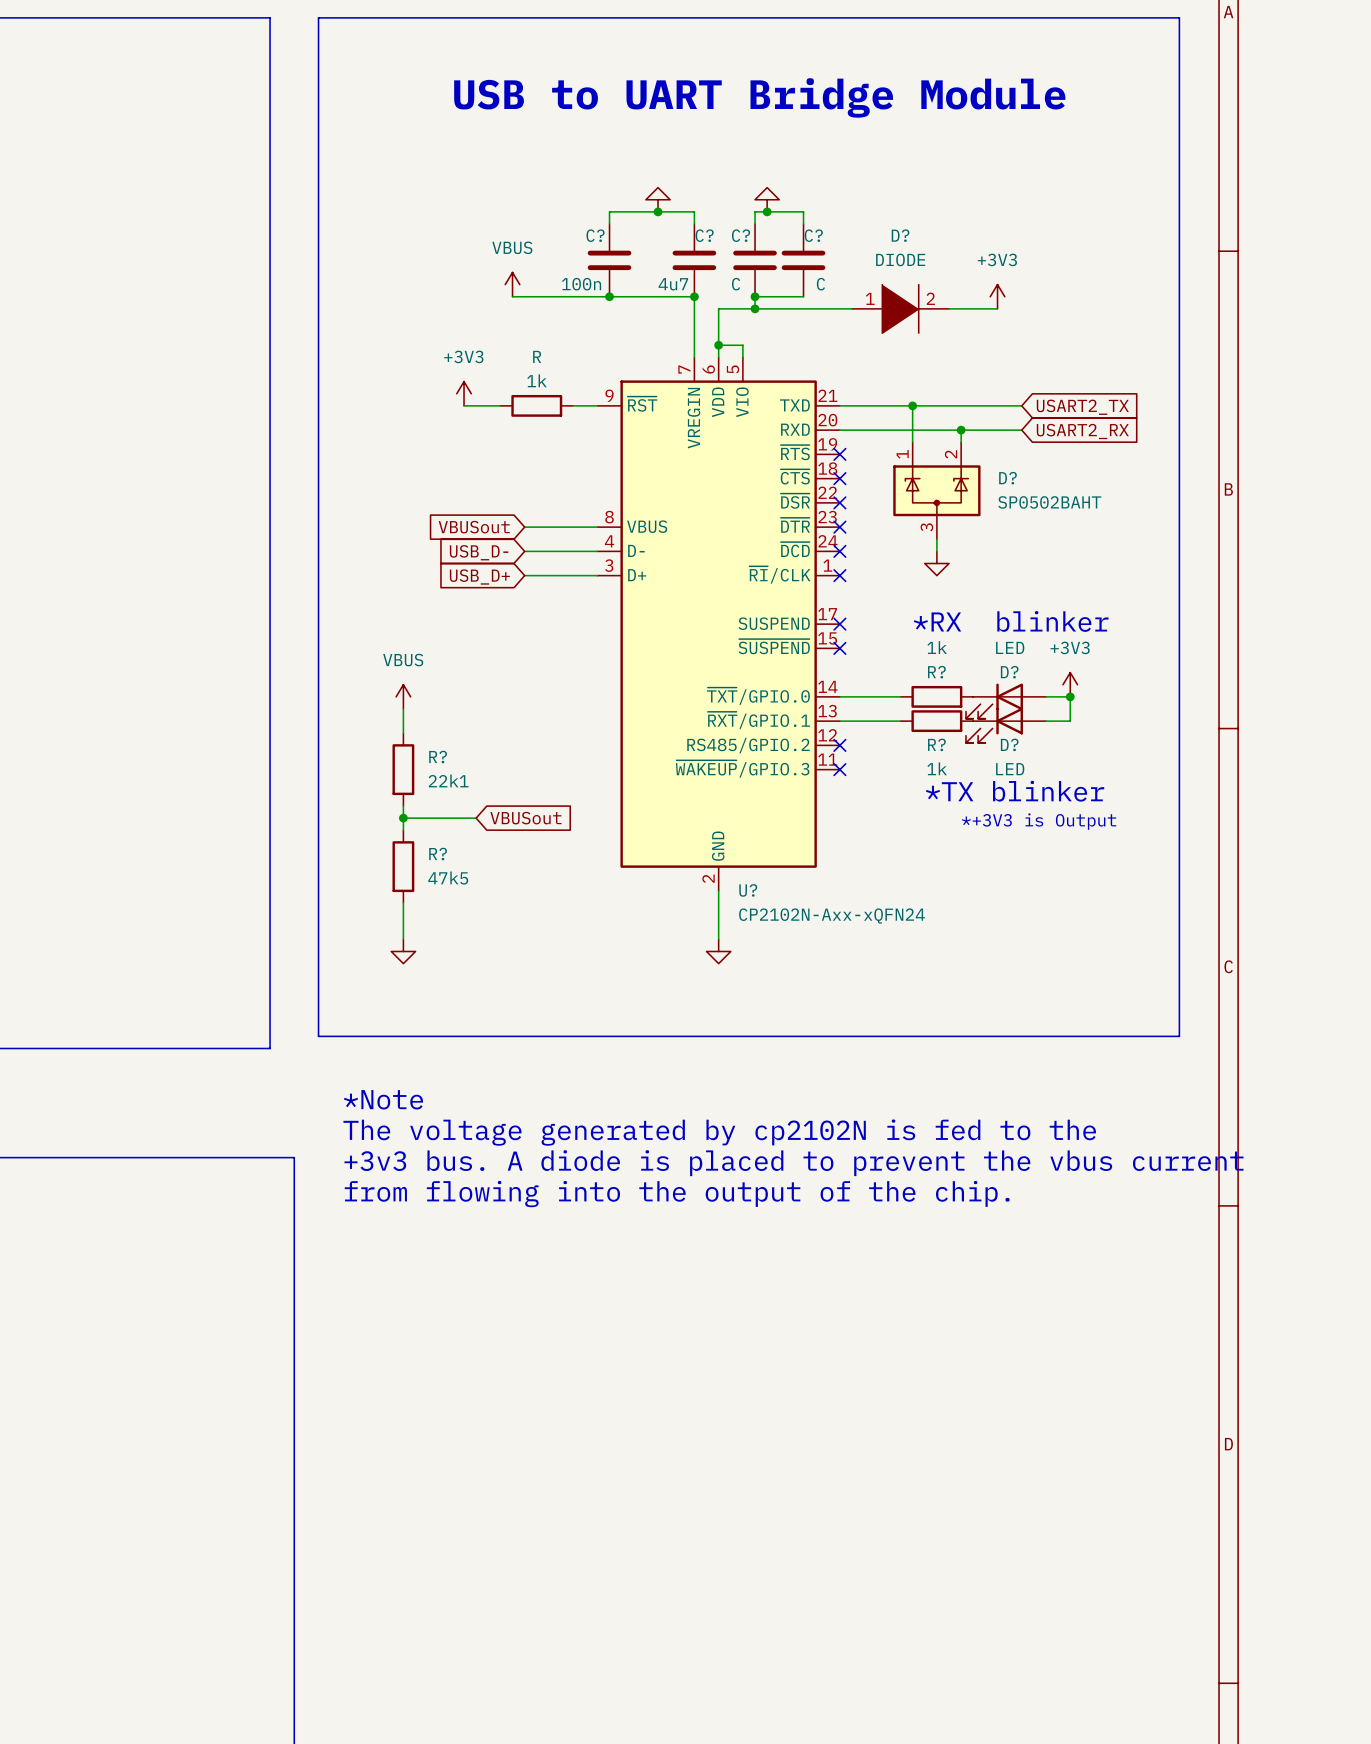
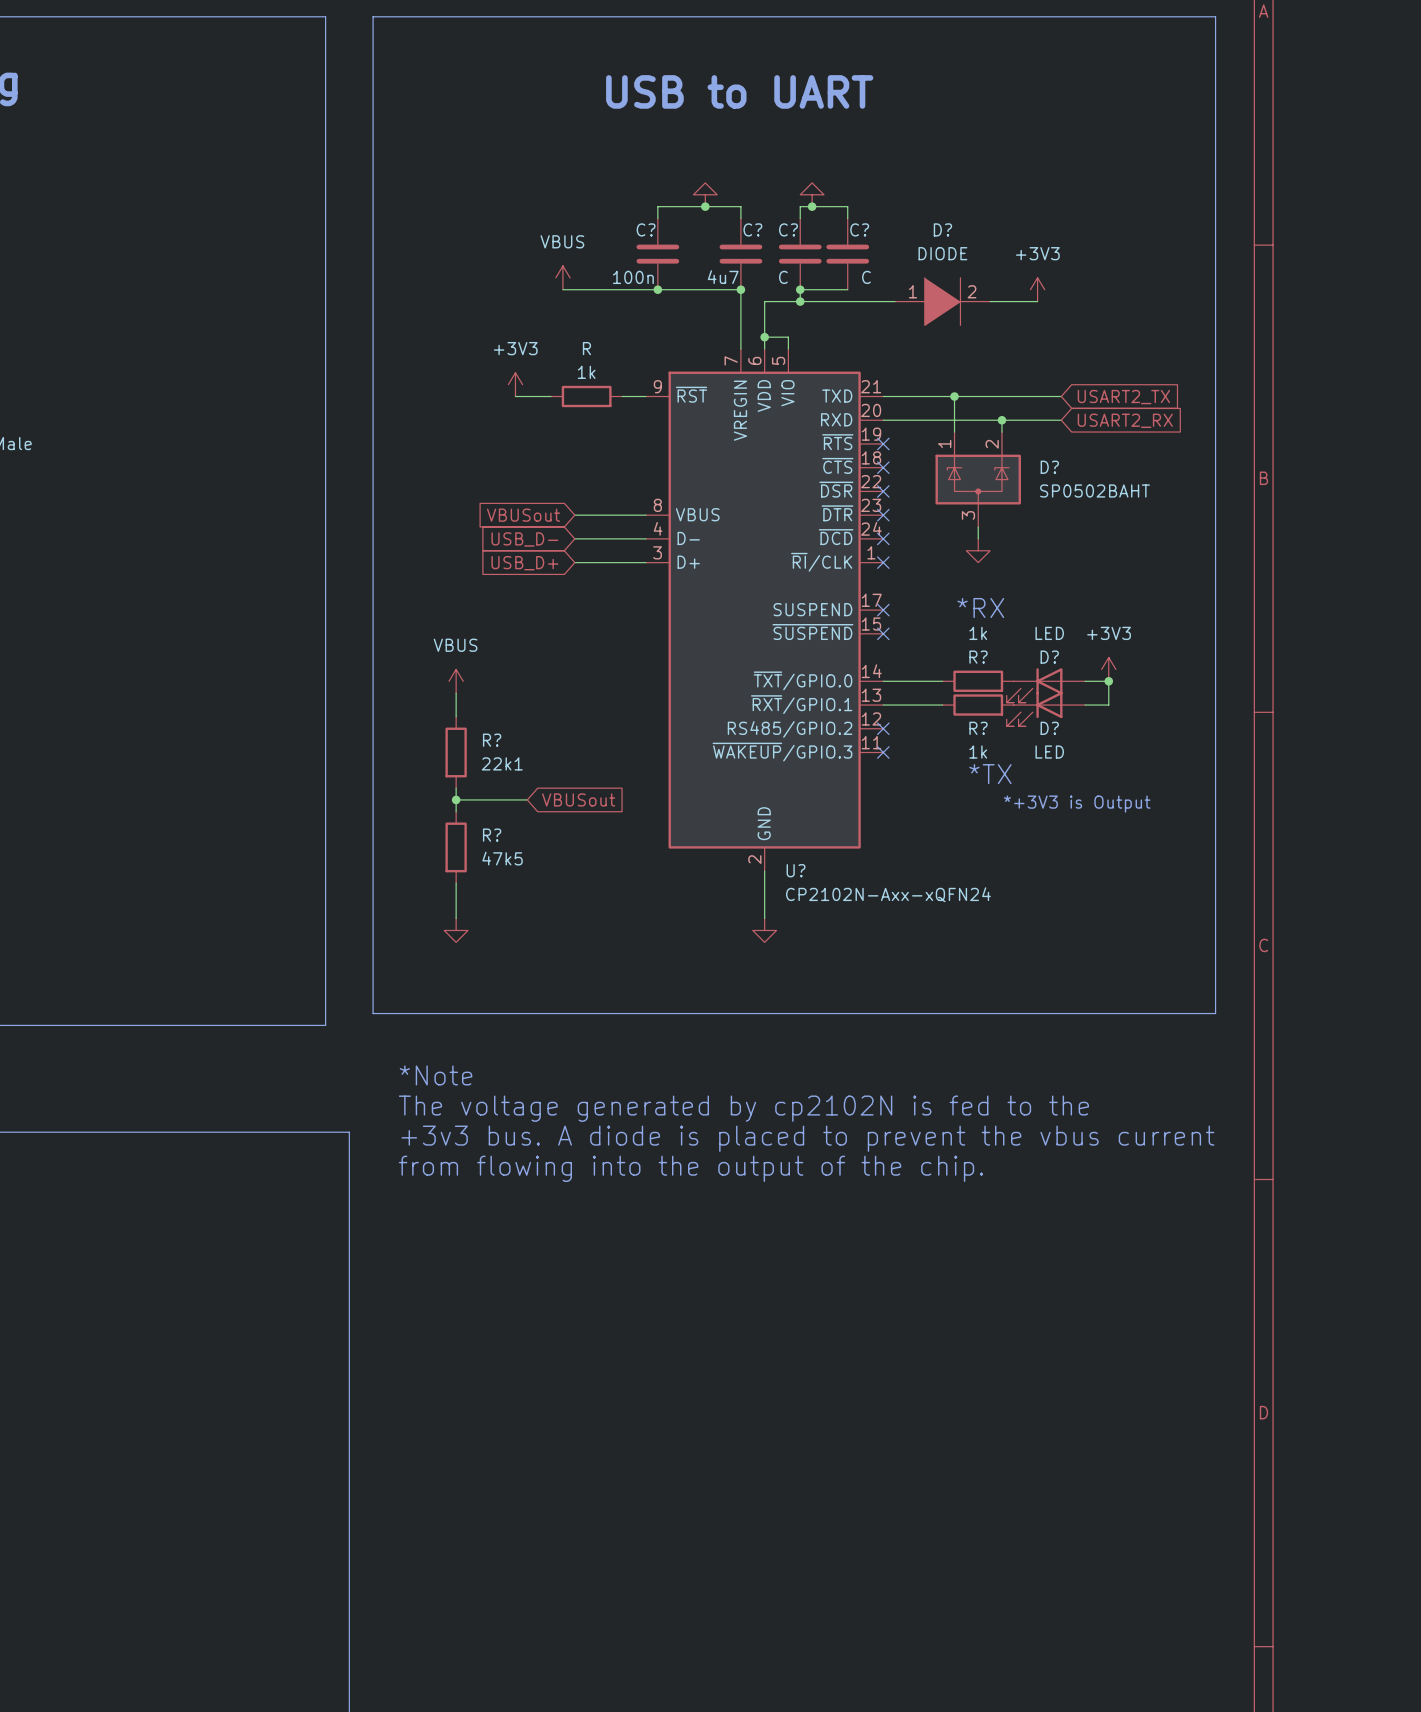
text: USB to UART Bridge Module (759, 97) -> USB to UART (739, 91)
text: *RX blinker (1011, 621) -> *RX (980, 608)
text: *TX blinker (1015, 791) -> *TX (990, 774)

